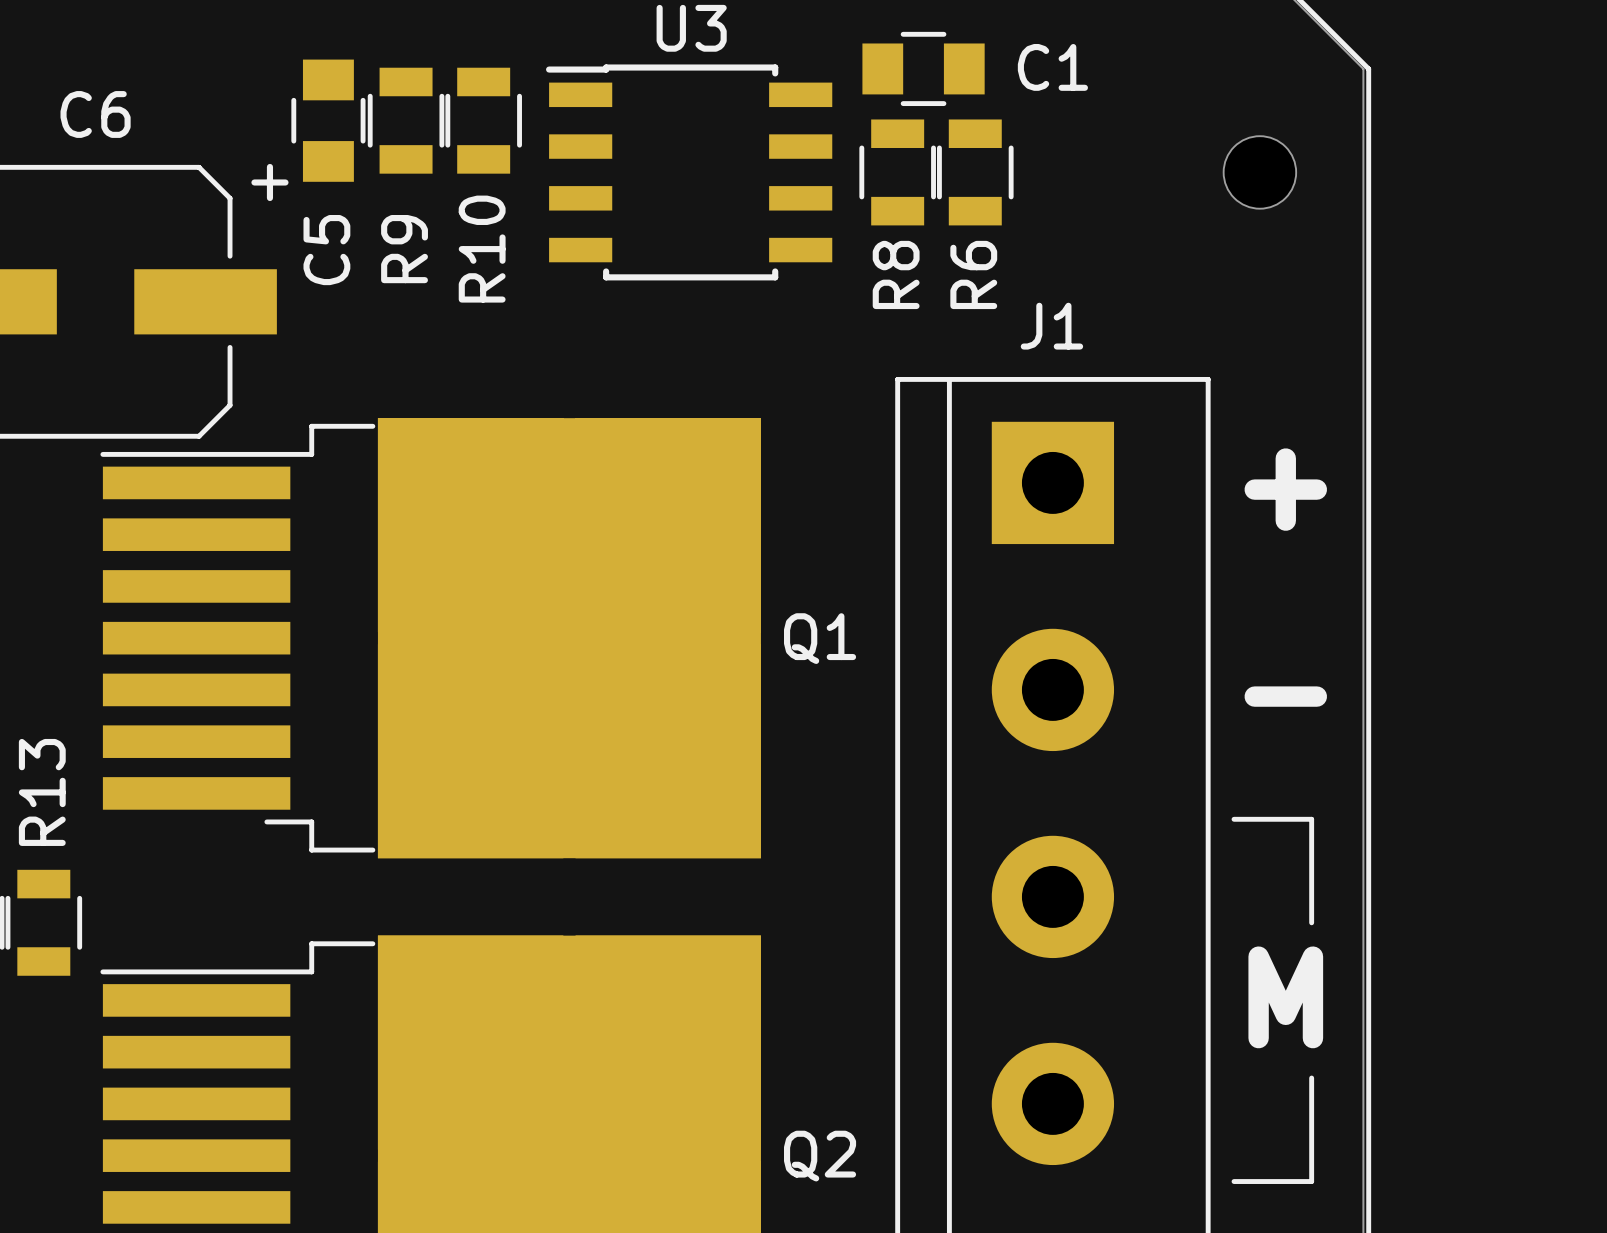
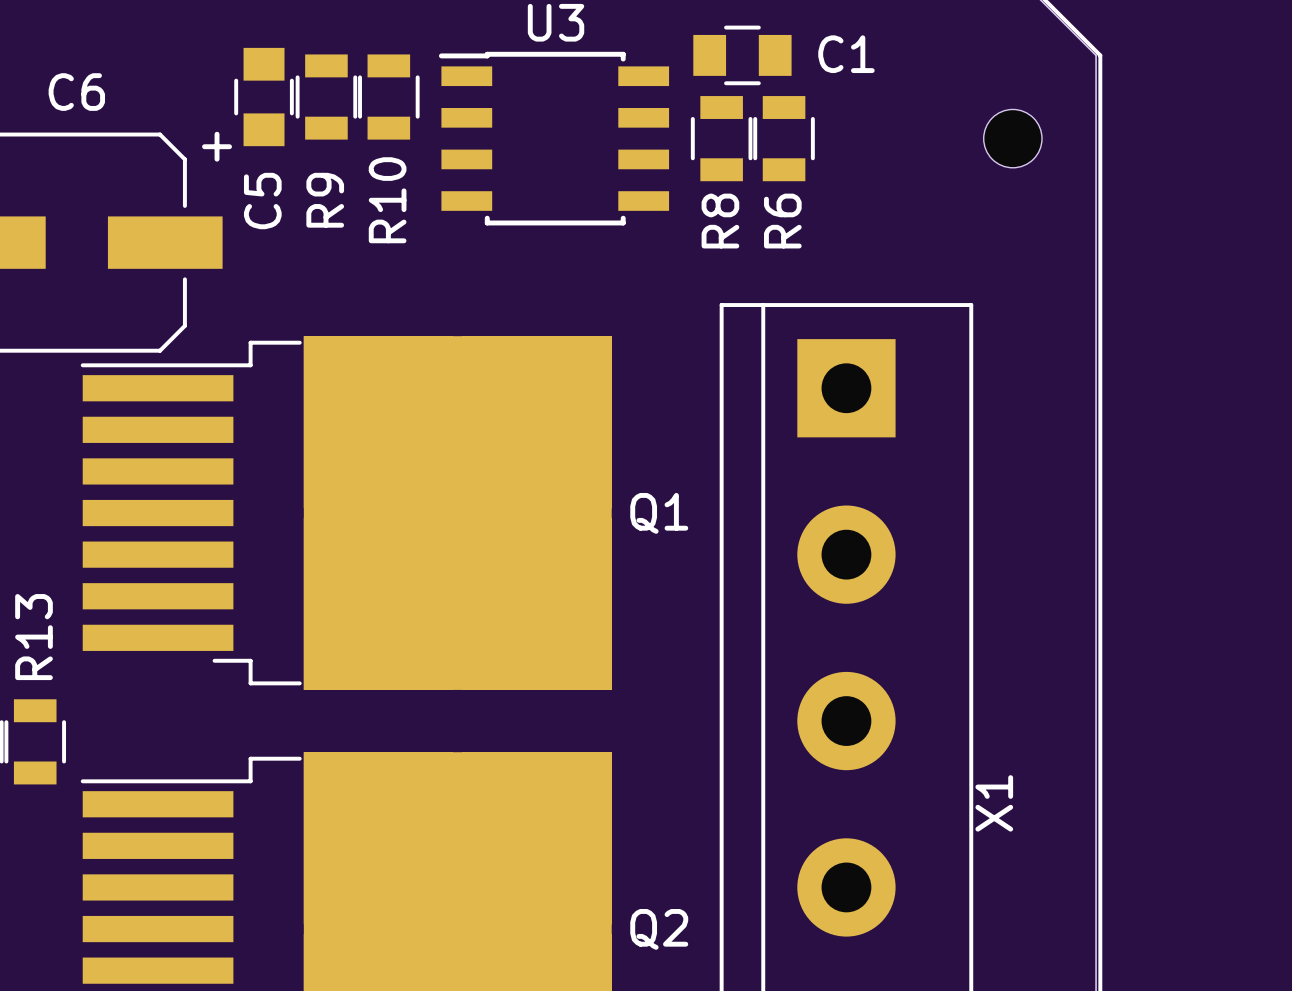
J1 name: J1 (1051, 326) -> X1 (994, 803)
text: + (1285, 489) -> none
text: - (1285, 696) -> none
line: (1234, 819) (1311, 819) (1311, 922) -> none
text: M (1285, 997) -> none
line: (1311, 1078) (1311, 1181) (1234, 1181) -> none

